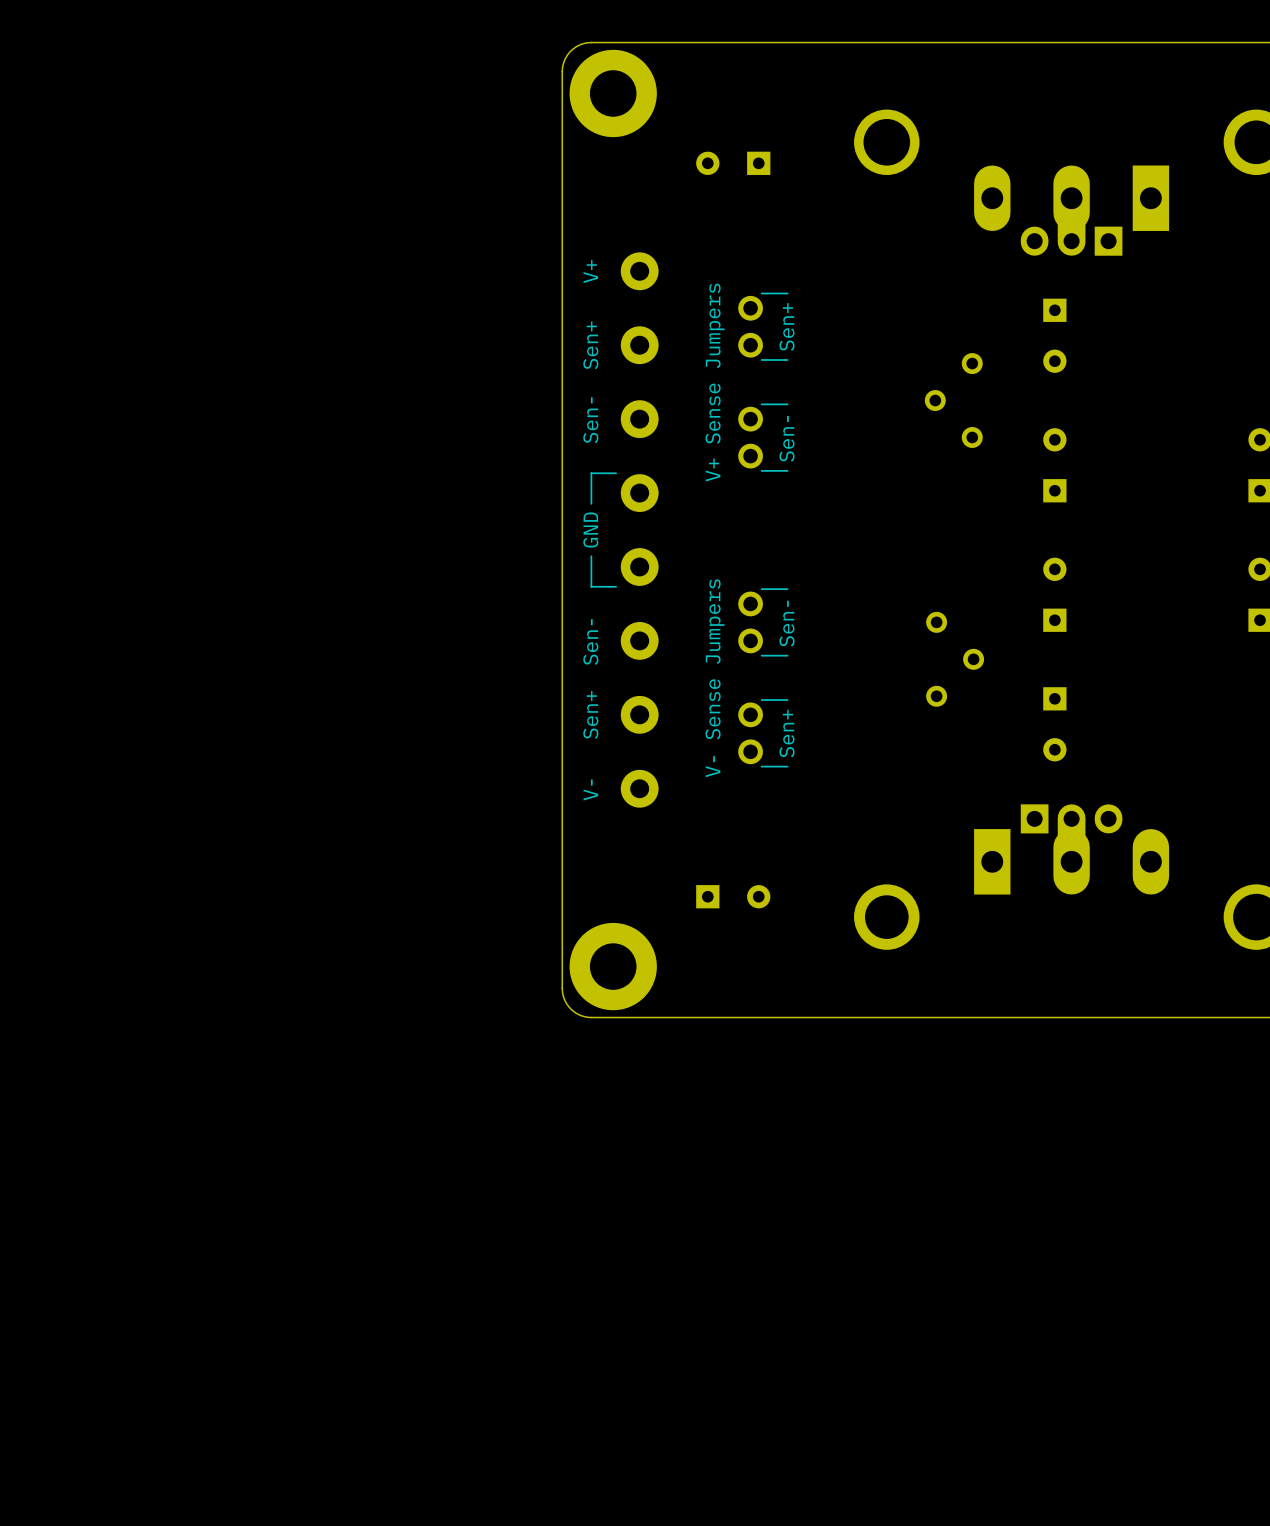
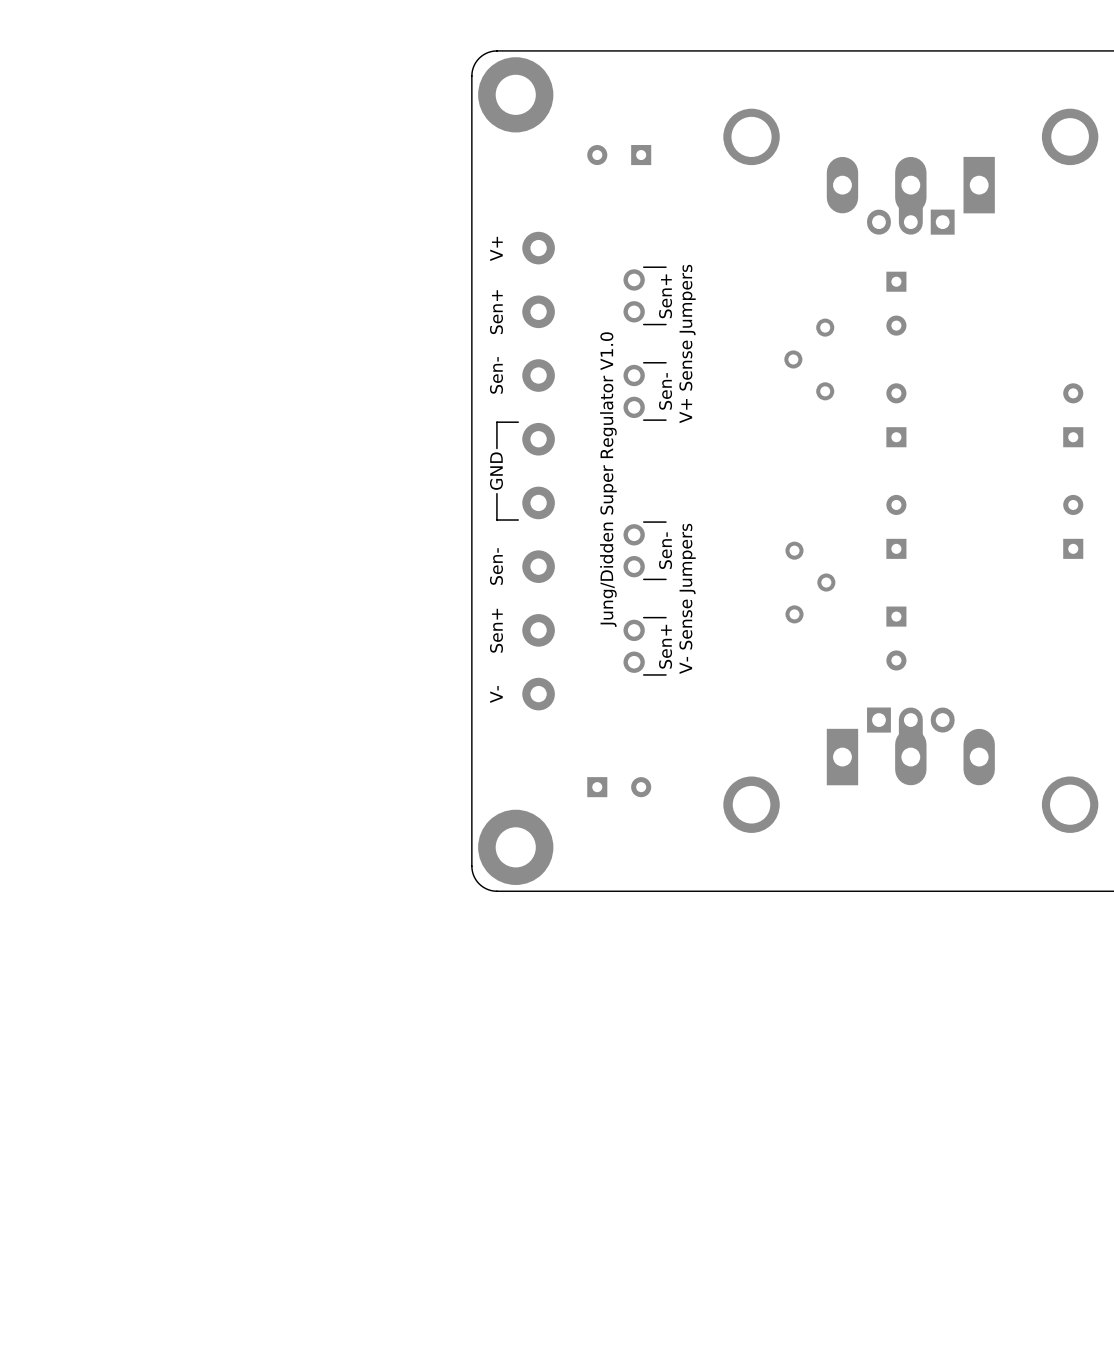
text position: V+ Sense Jumpers (715, 382) -> V+ Sense Jumpers (687, 344)
text: none -> Jung/Didden Super Regulator V1.0 (608, 479)
text position: V- Sense Jumpers (715, 678) -> V- Sense Jumpers (687, 598)

